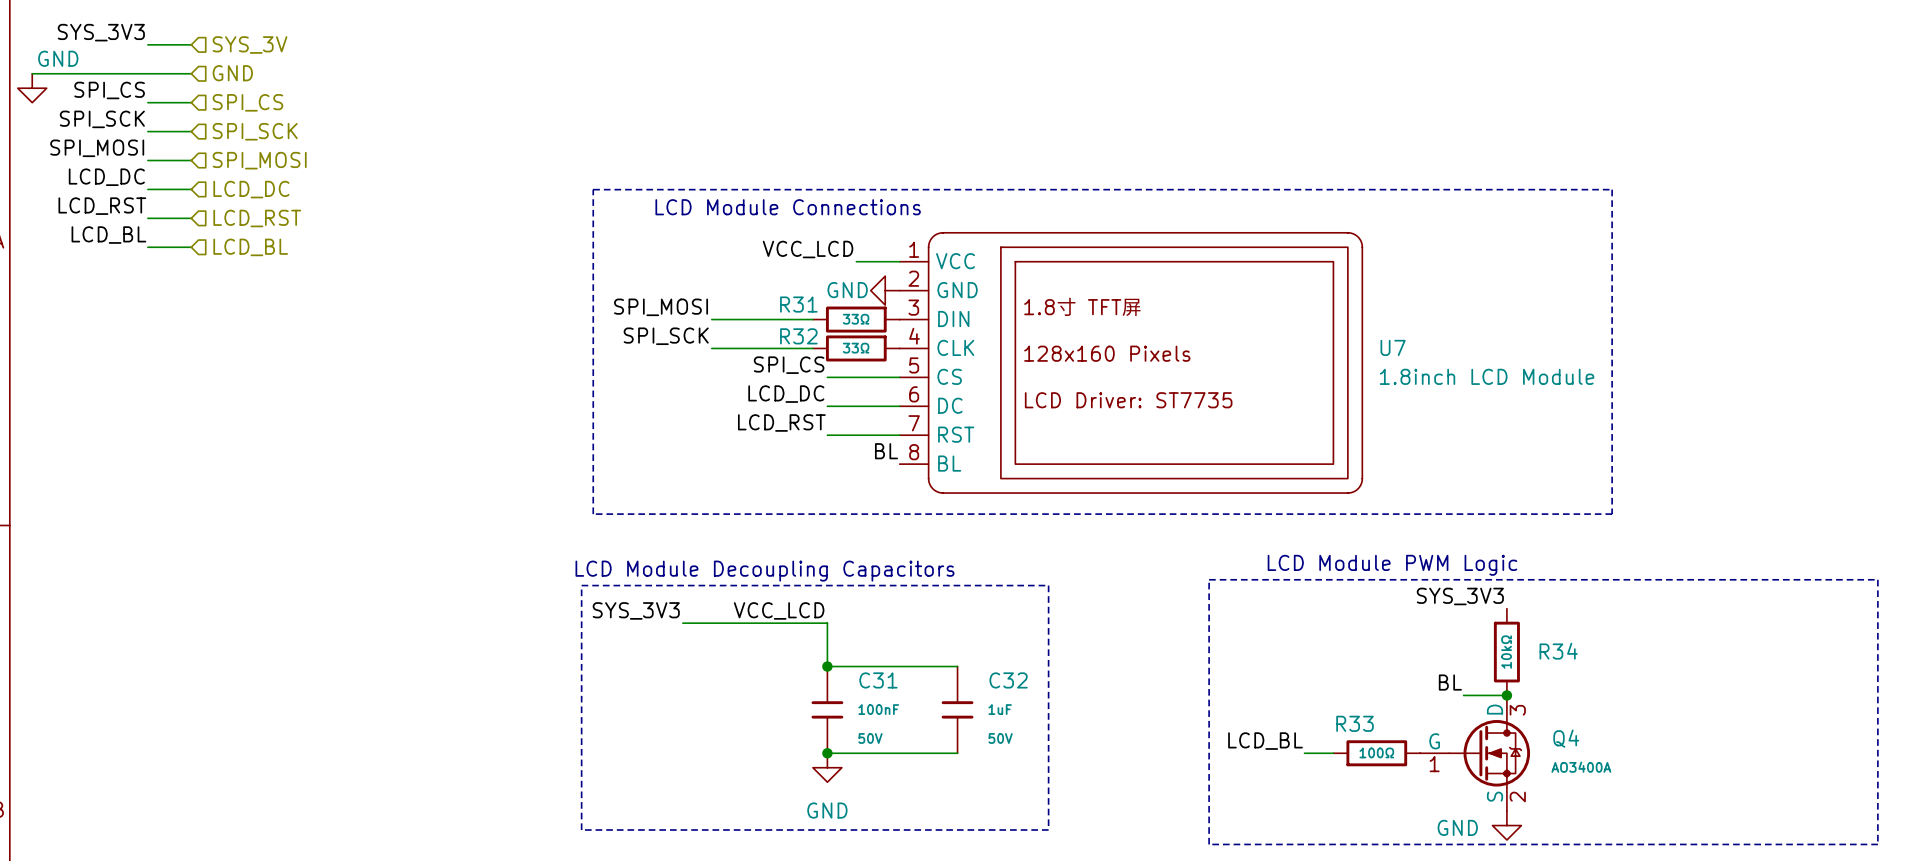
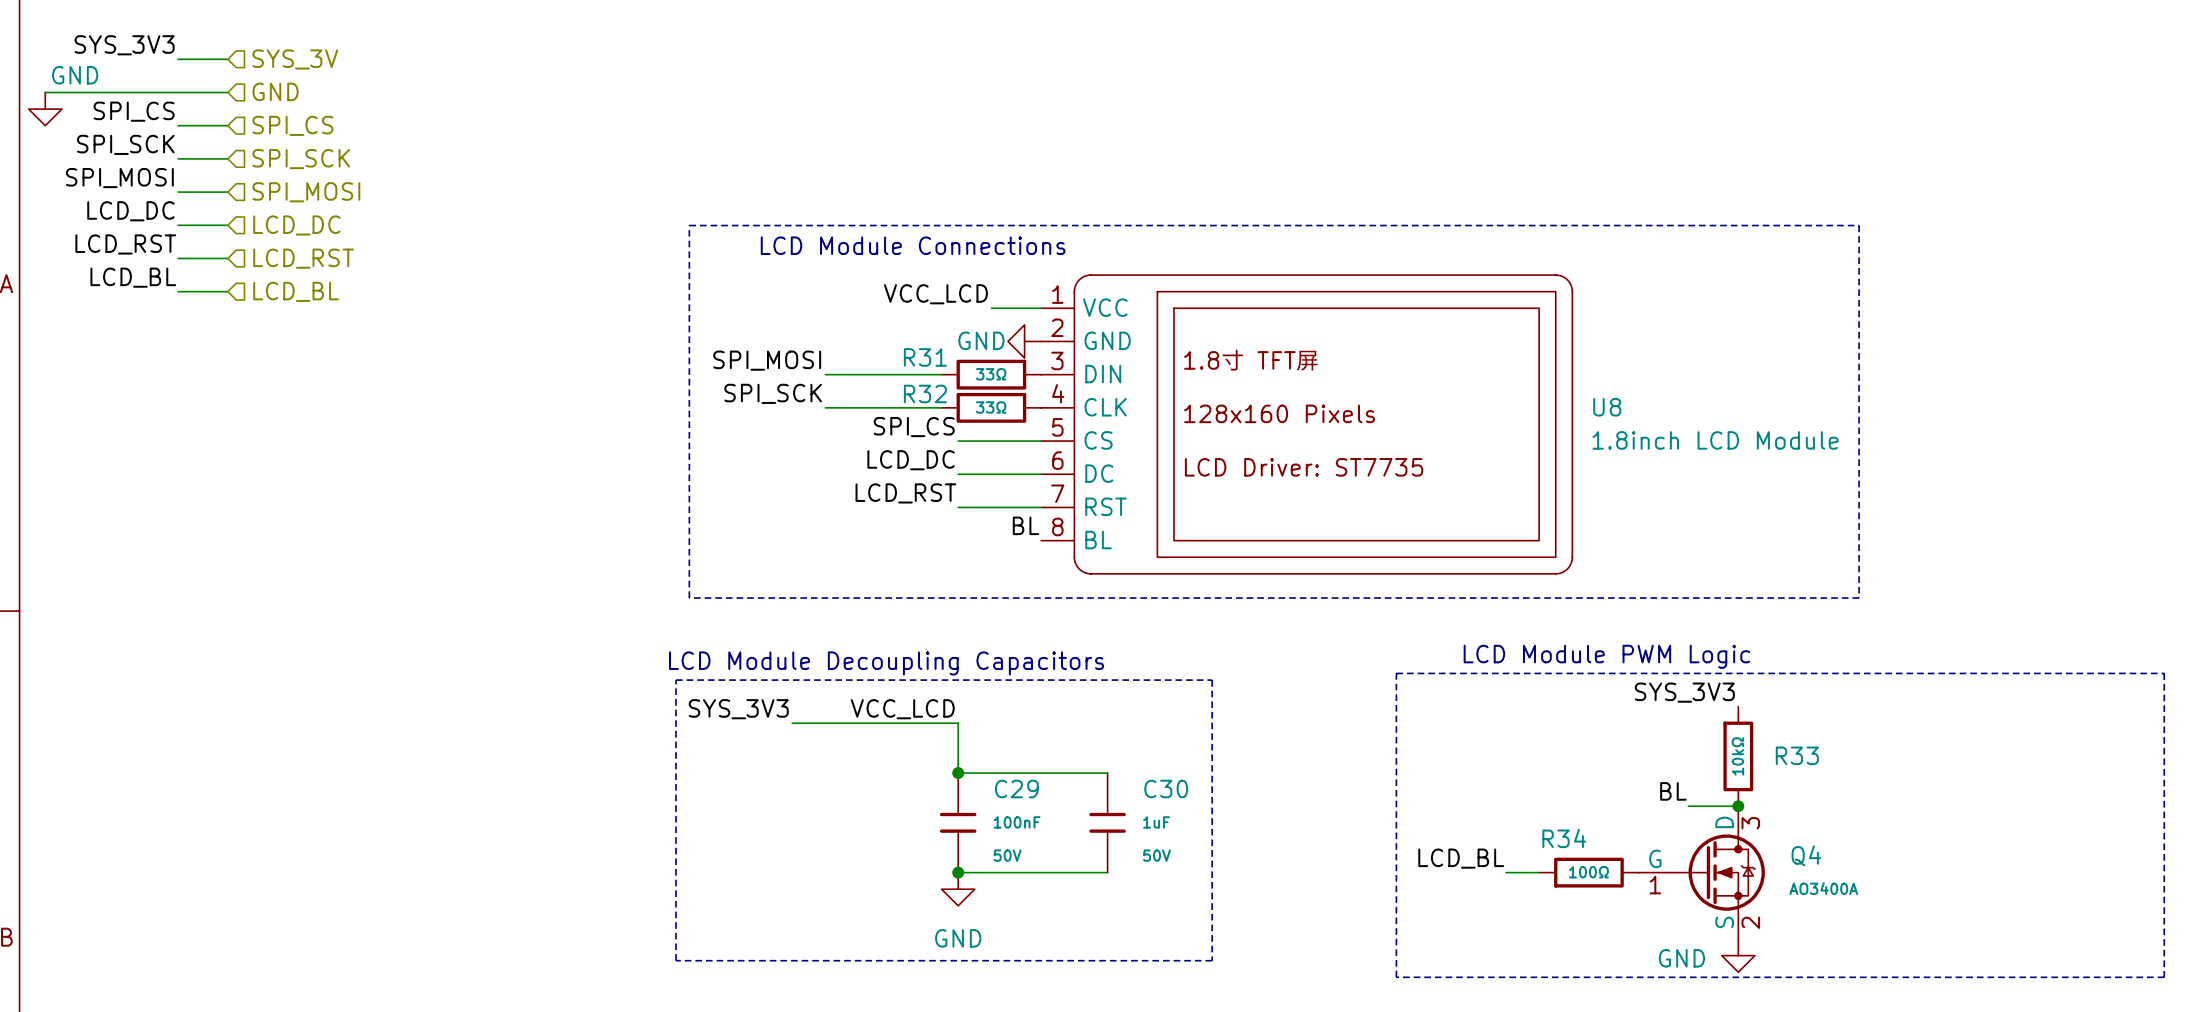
U7 name: U7 (1393, 347) -> U8 (1607, 407)
R34 name: R34 (1558, 651) -> R33 (1797, 755)
C31 name: C31 (878, 680) -> C29 (1016, 789)
C32 name: C32 (1008, 680) -> C30 (1166, 789)
R33 name: R33 (1355, 723) -> R34 (1564, 838)

